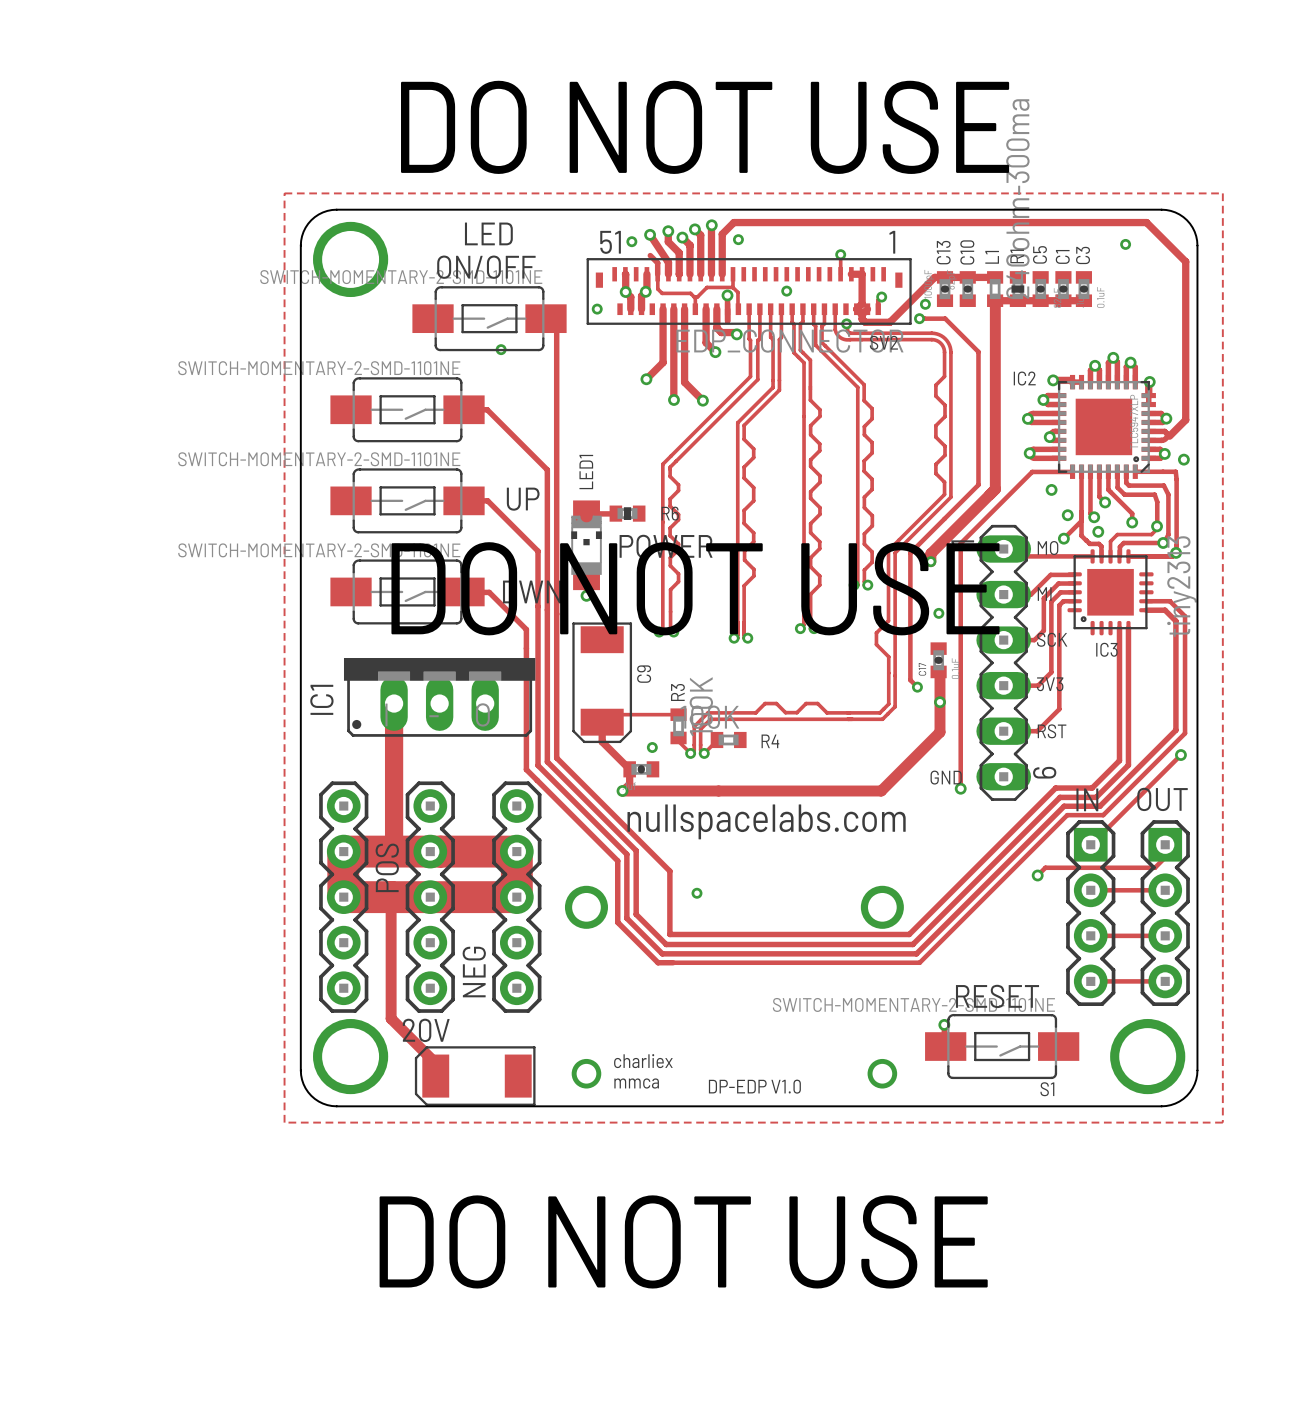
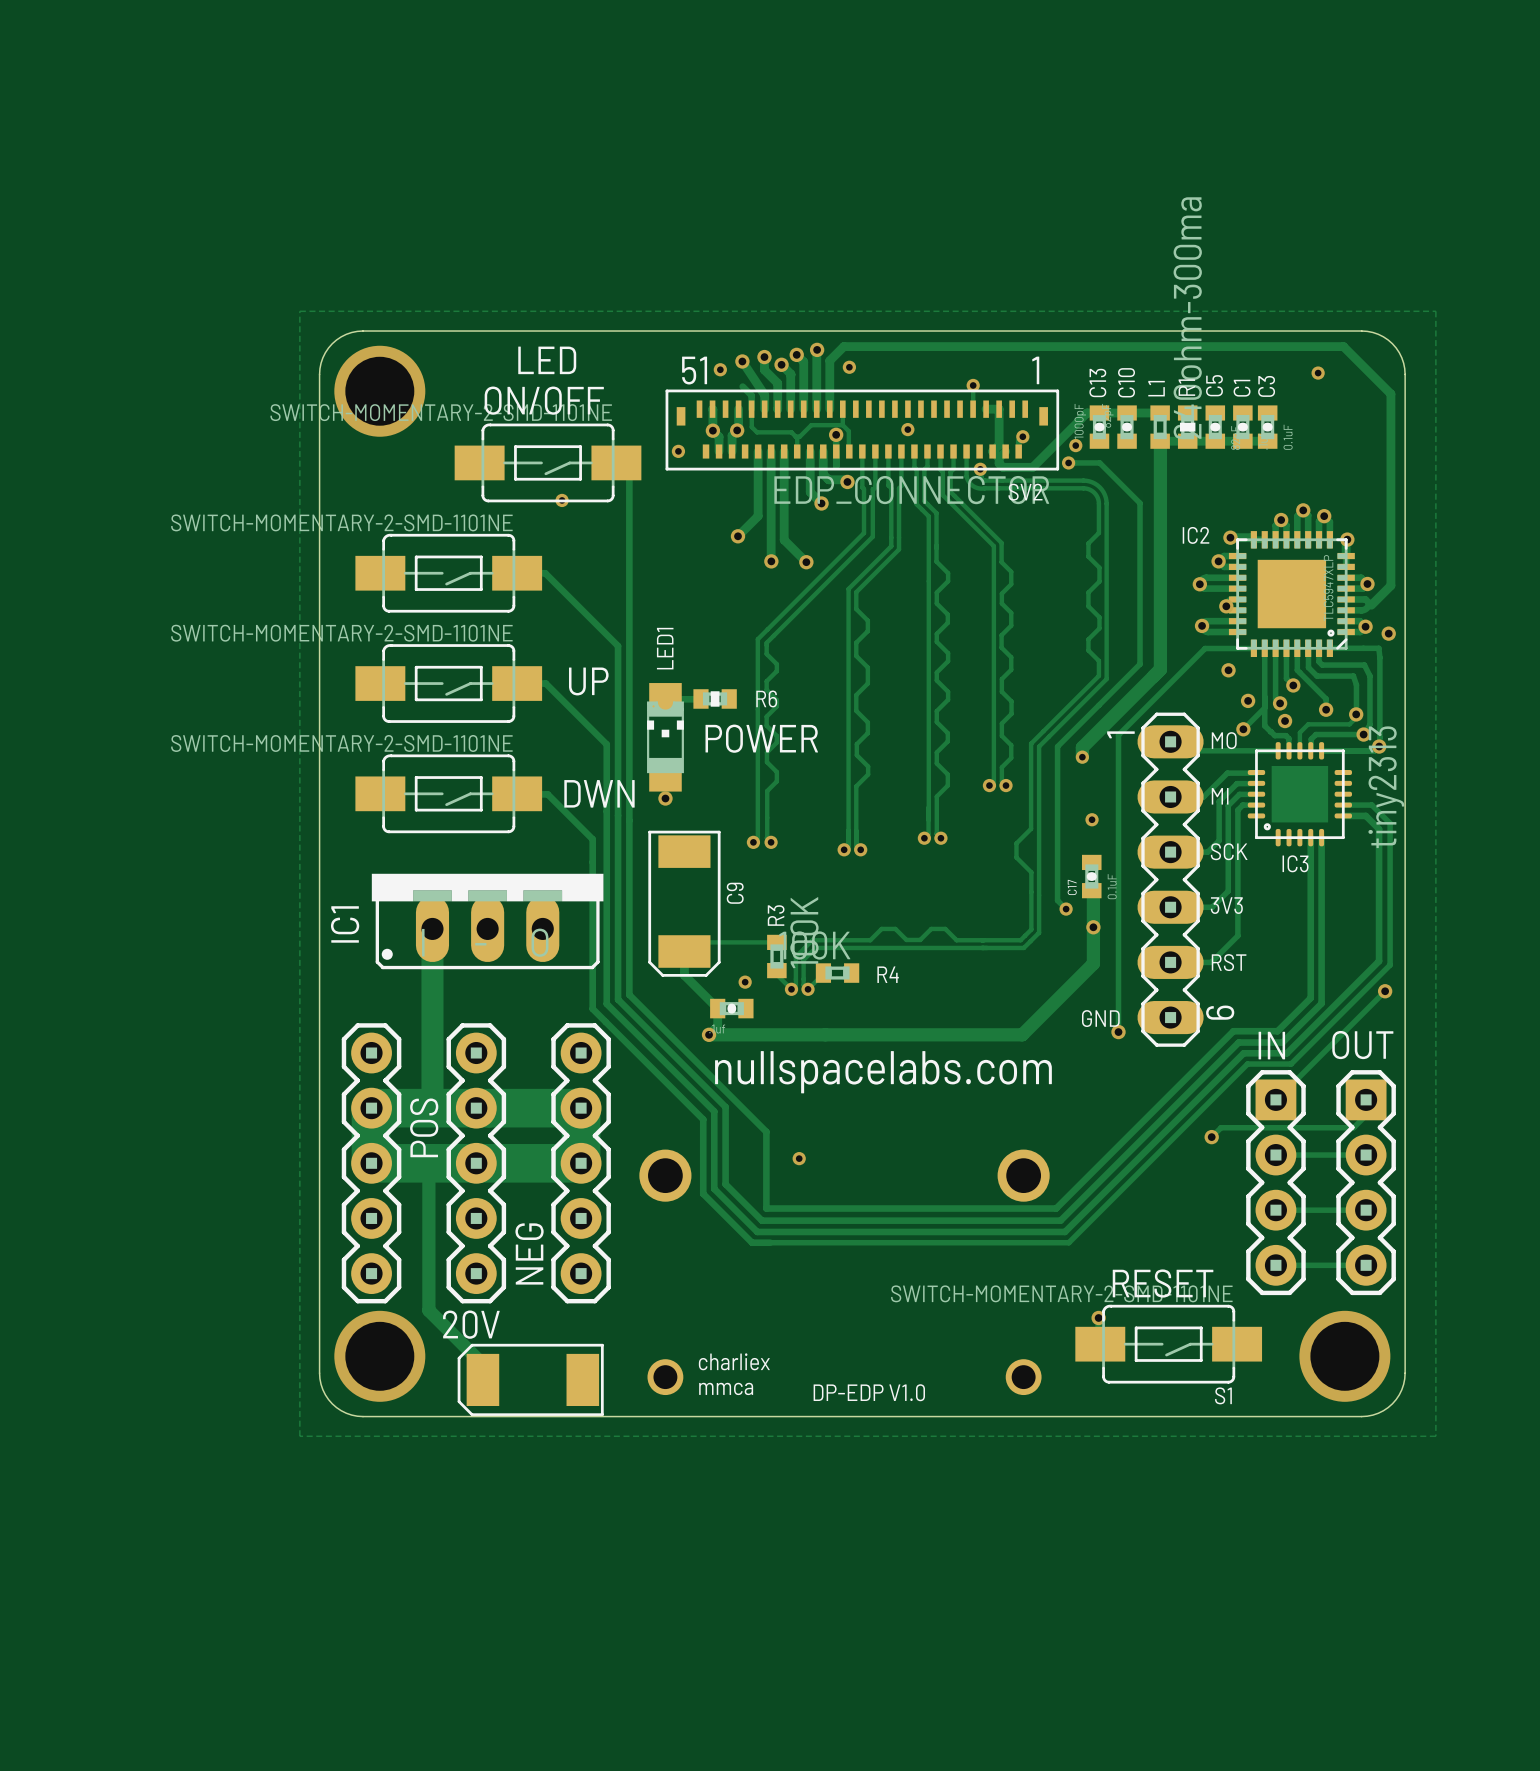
text: DO NOT USE (705, 127) -> none
text: DO NOT USE (695, 588) -> none
text: DO NOT USE (683, 1241) -> none

